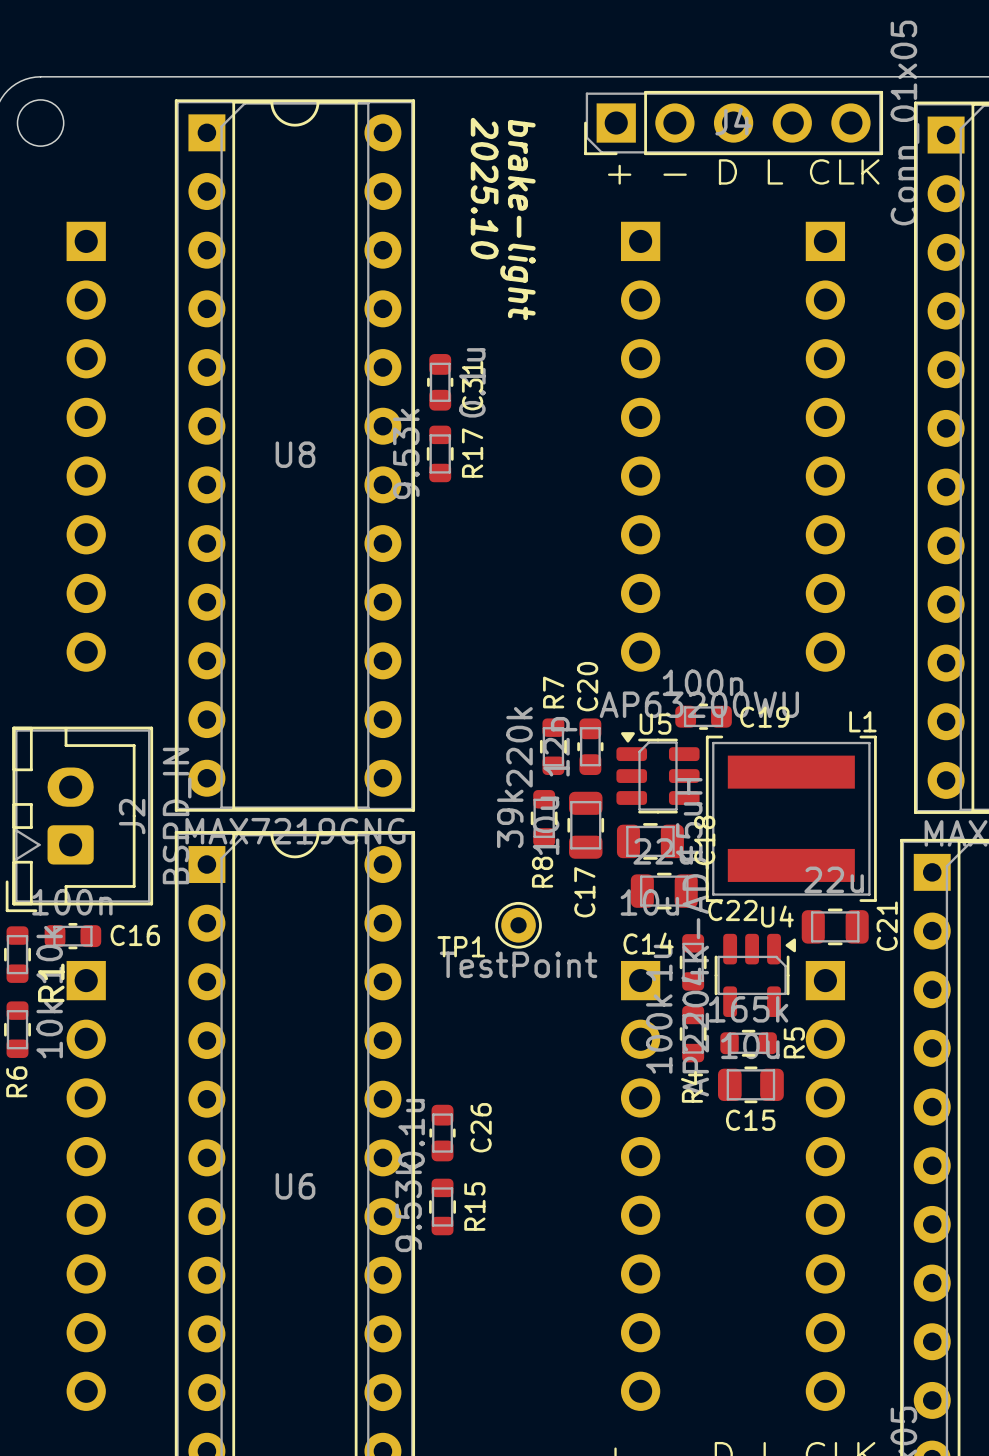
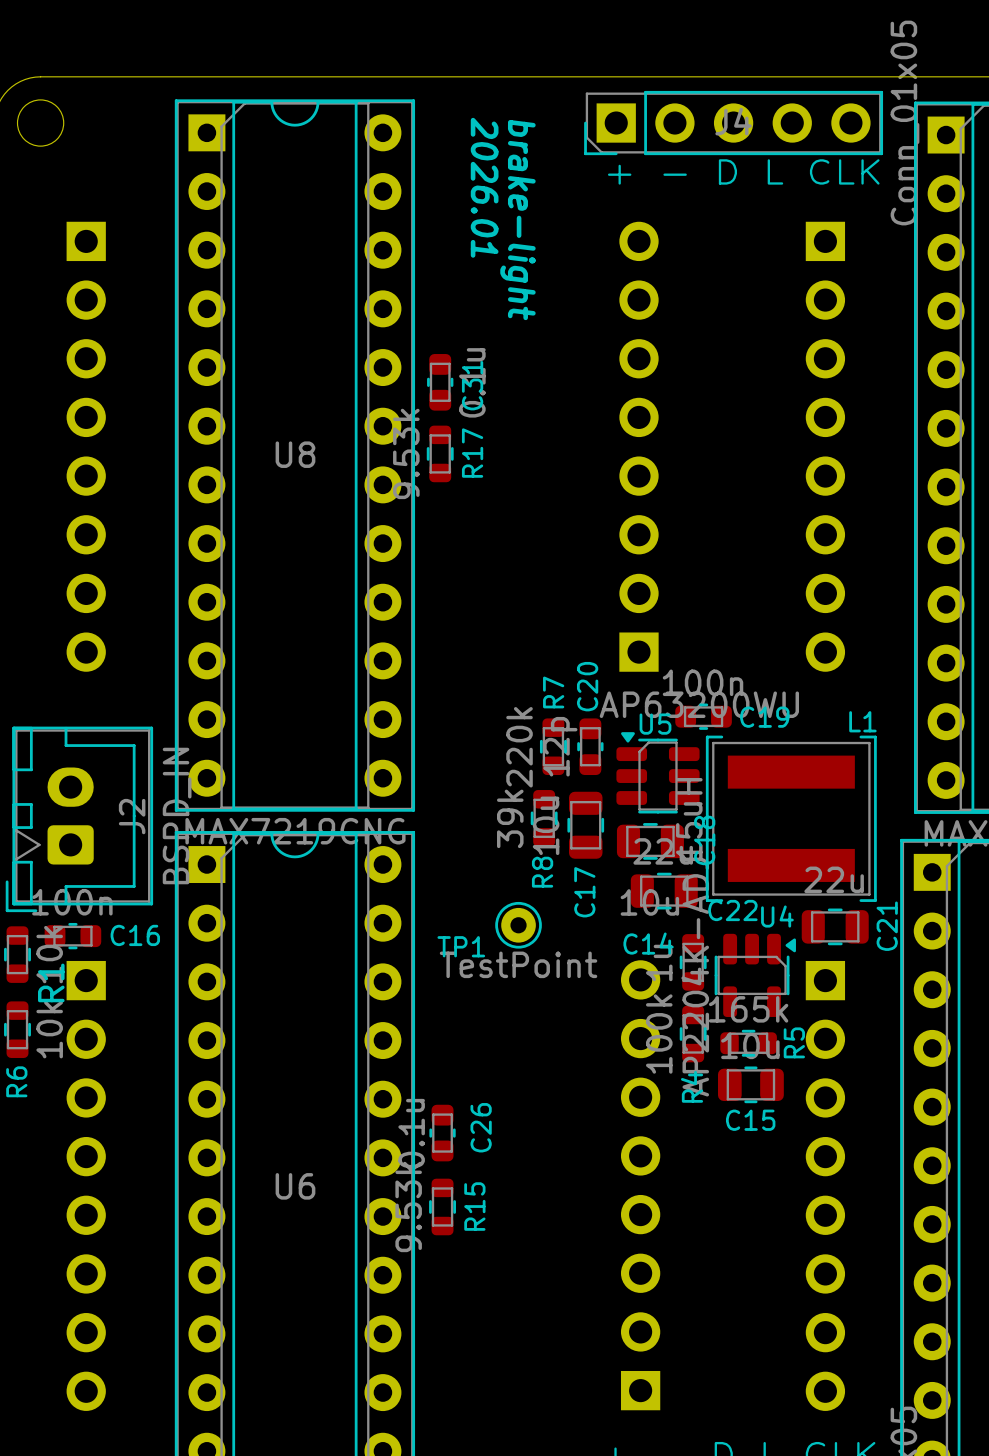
text: 2025.10 (484, 188) -> 2026.01 (484, 187)
part rotation: 0° (640, 446) -> 180° (639, 446)
part rotation: 0° (640, 1185) -> 180° (640, 1185)

